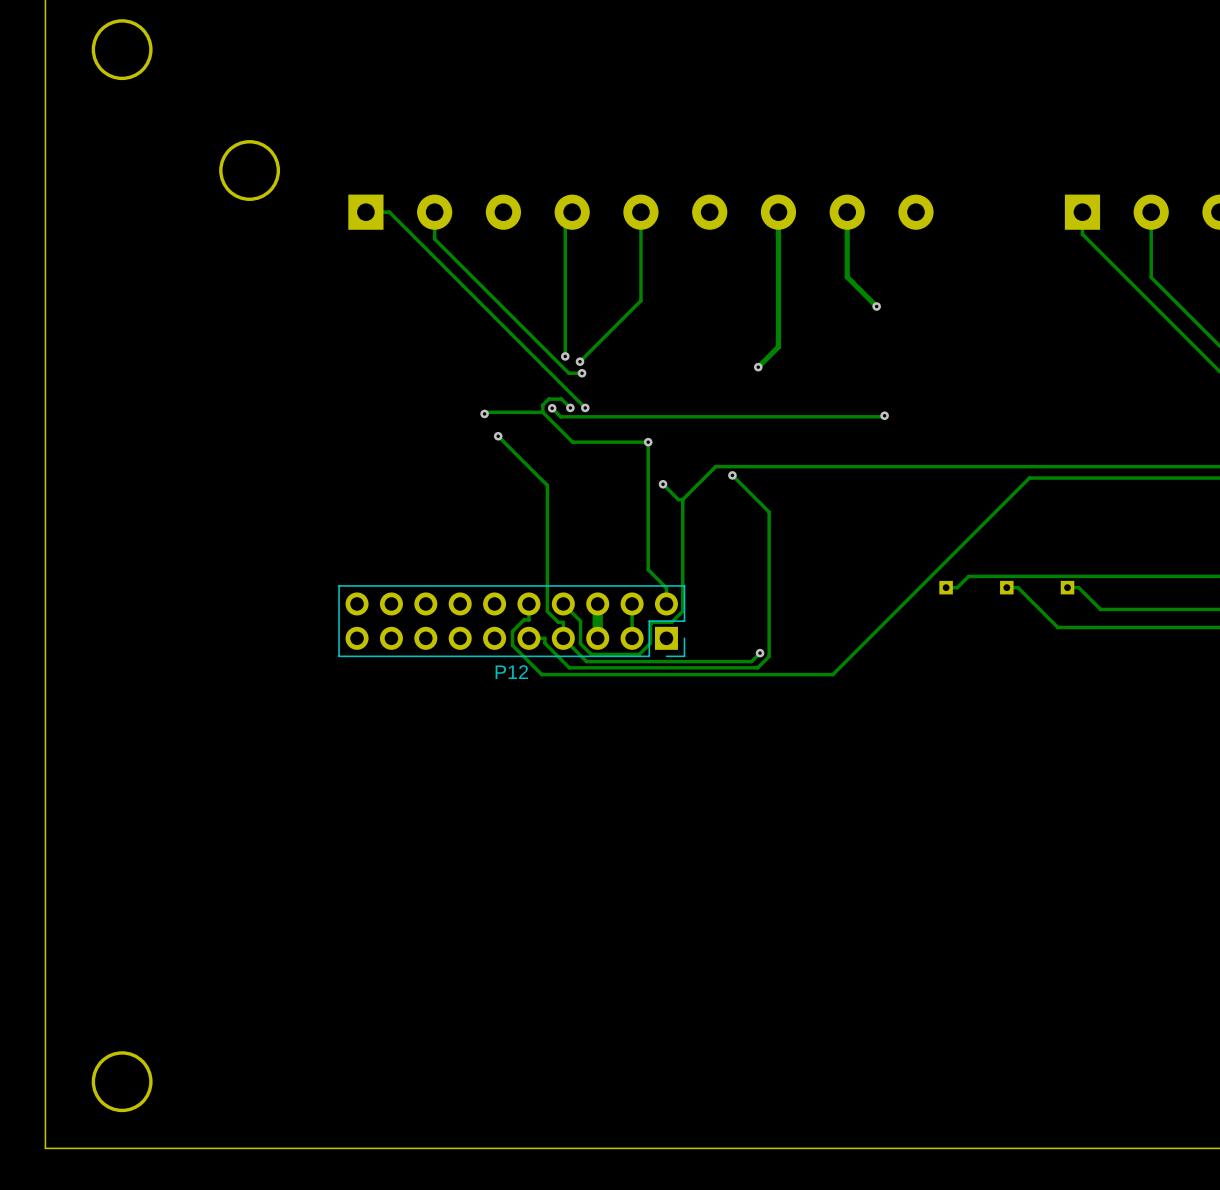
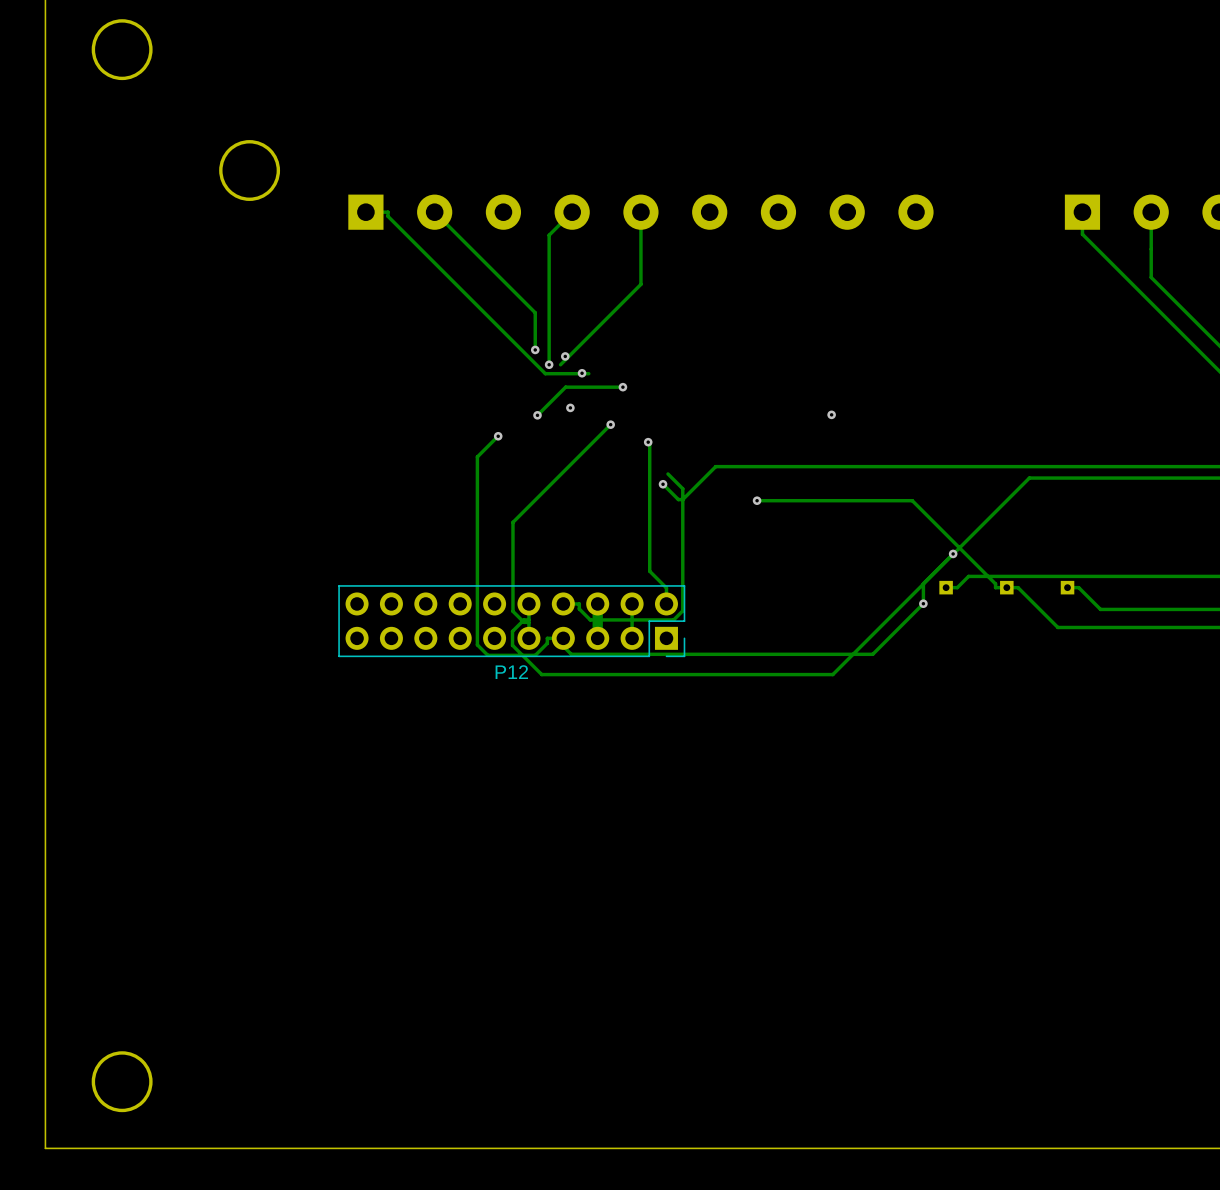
track: (387, 212) (585, 407) -> (387, 212) (387, 216) (545, 373) (588, 373)
track: (434, 212) (434, 239) (568, 373) (582, 373) -> (434, 212) (535, 312) (535, 349)
track: (778, 212) (778, 346) (758, 367) -> none
track: (847, 212) (847, 277) (876, 306) -> none
track: (565, 219) (565, 356) -> (565, 219) (549, 235) (549, 364)
track: (640, 284) (640, 300) (580, 361) -> (640, 284) (560, 364)
via: (876, 306) -> none
via: none -> (535, 349)
via: (580, 361) -> none
via: none -> (549, 364)
via: (758, 367) -> none
track: none -> (622, 387) (565, 387) (537, 415)
via: none -> (622, 387)
track: (570, 407) (561, 399) (548, 399) (542, 405) (542, 412) -> none
via: (585, 407) -> none
track: (552, 408) (560, 416) (884, 415) -> none
via position: (552, 408) -> (537, 415)
track: (542, 412) (572, 442) (648, 442) (648, 569) (649, 571) -> (649, 443) (649, 571)
track: (542, 412) (486, 412) (484, 413) -> none
via: (484, 413) -> none
via: none -> (831, 414)
via: (884, 415) -> none
via: none -> (610, 424)
track: (498, 436) (547, 485) (547, 611) (558, 622) (563, 622) (563, 638) (586, 661) (751, 661) (760, 653) -> (498, 435) (477, 456) (477, 644) (487, 655) (535, 655) (547, 643) (547, 638) (563, 638)
track: none -> (667, 473) (682, 488) (682, 499)
track: (732, 475) (769, 512) (769, 656) (757, 667) (569, 667) (544, 643) (544, 638) (528, 638) -> (610, 424) (512, 522) (512, 611) (523, 622) (528, 622) (528, 638)
via position: (732, 475) -> (757, 500)
track: none -> (757, 500) (912, 500) (995, 583) (995, 587) (1006, 587)
track: none -> (953, 553) (923, 583) (923, 603) (872, 654) (571, 654) (555, 638)
via: none -> (953, 553)
track: (563, 603) (580, 621) (580, 643) (591, 654) (639, 654) (650, 643) (650, 624) (652, 622) (671, 622) (682, 610) -> (563, 603) (579, 603) (579, 608) (590, 619) (673, 619) (682, 610)
via: none -> (923, 603)
via: (760, 653) -> none

